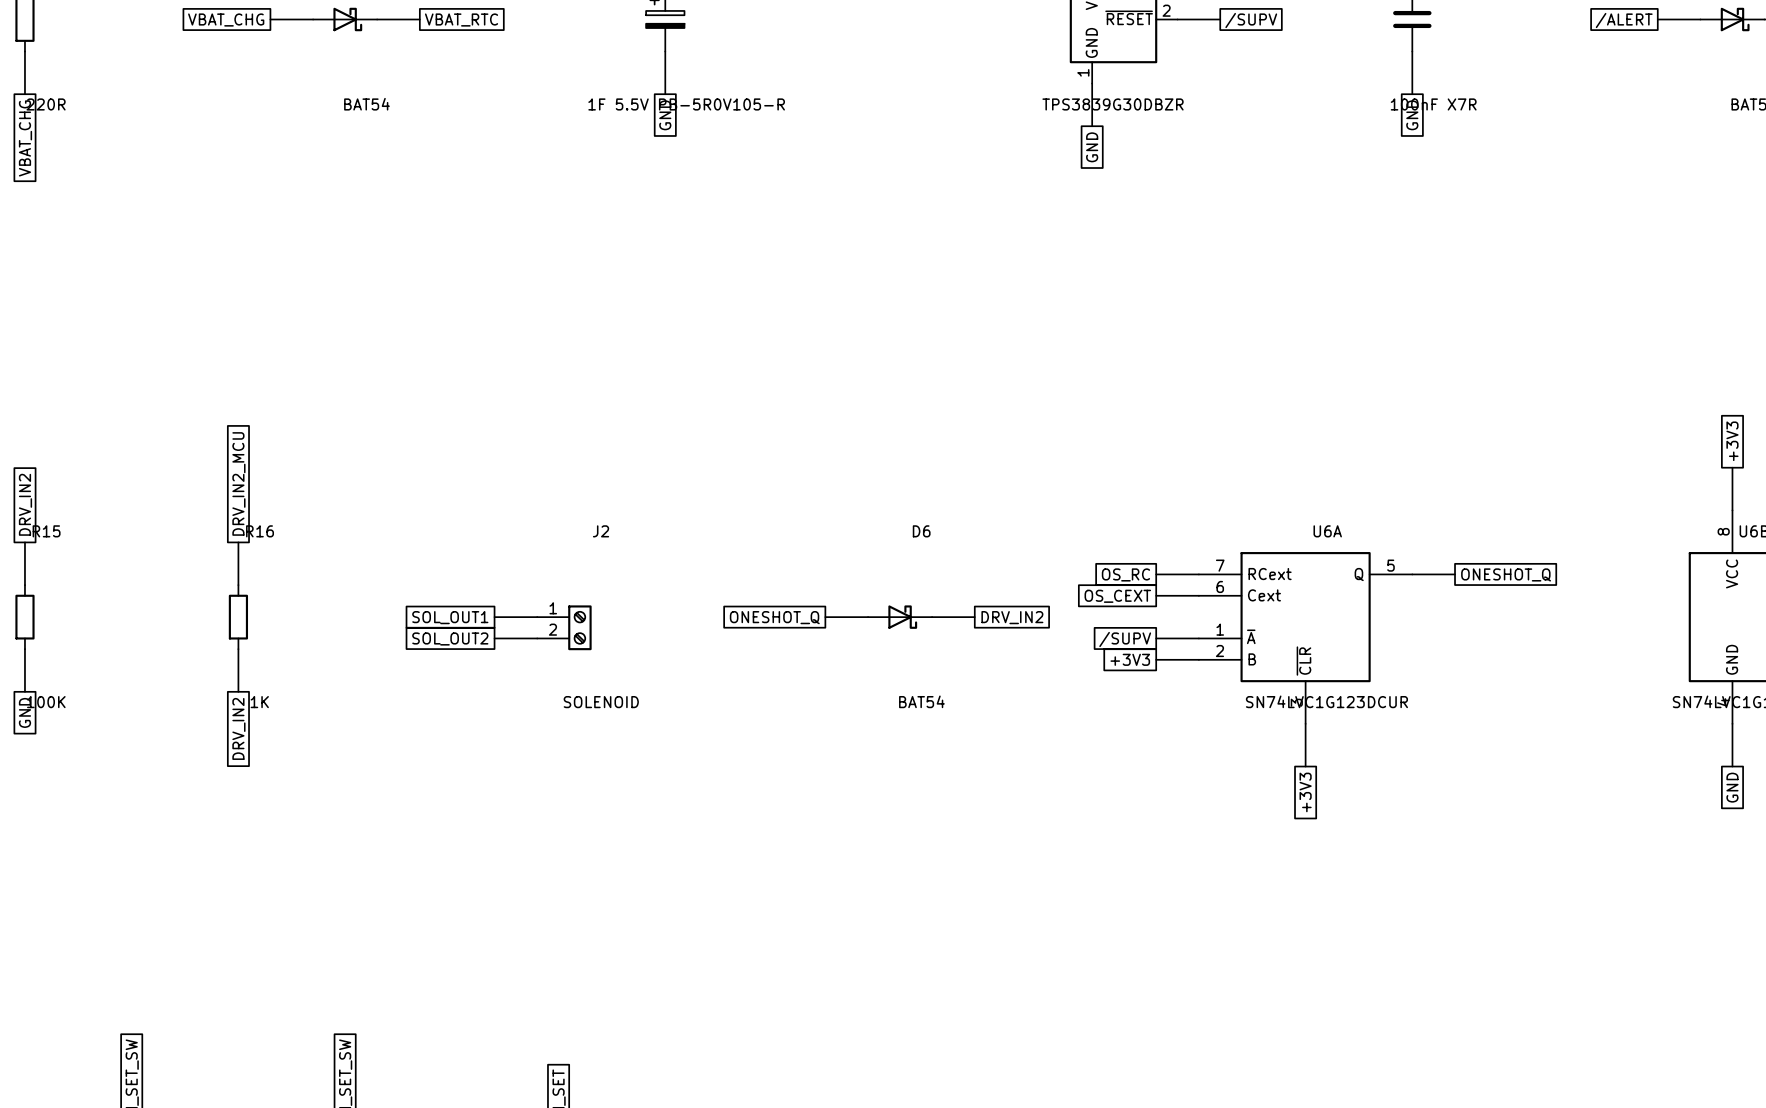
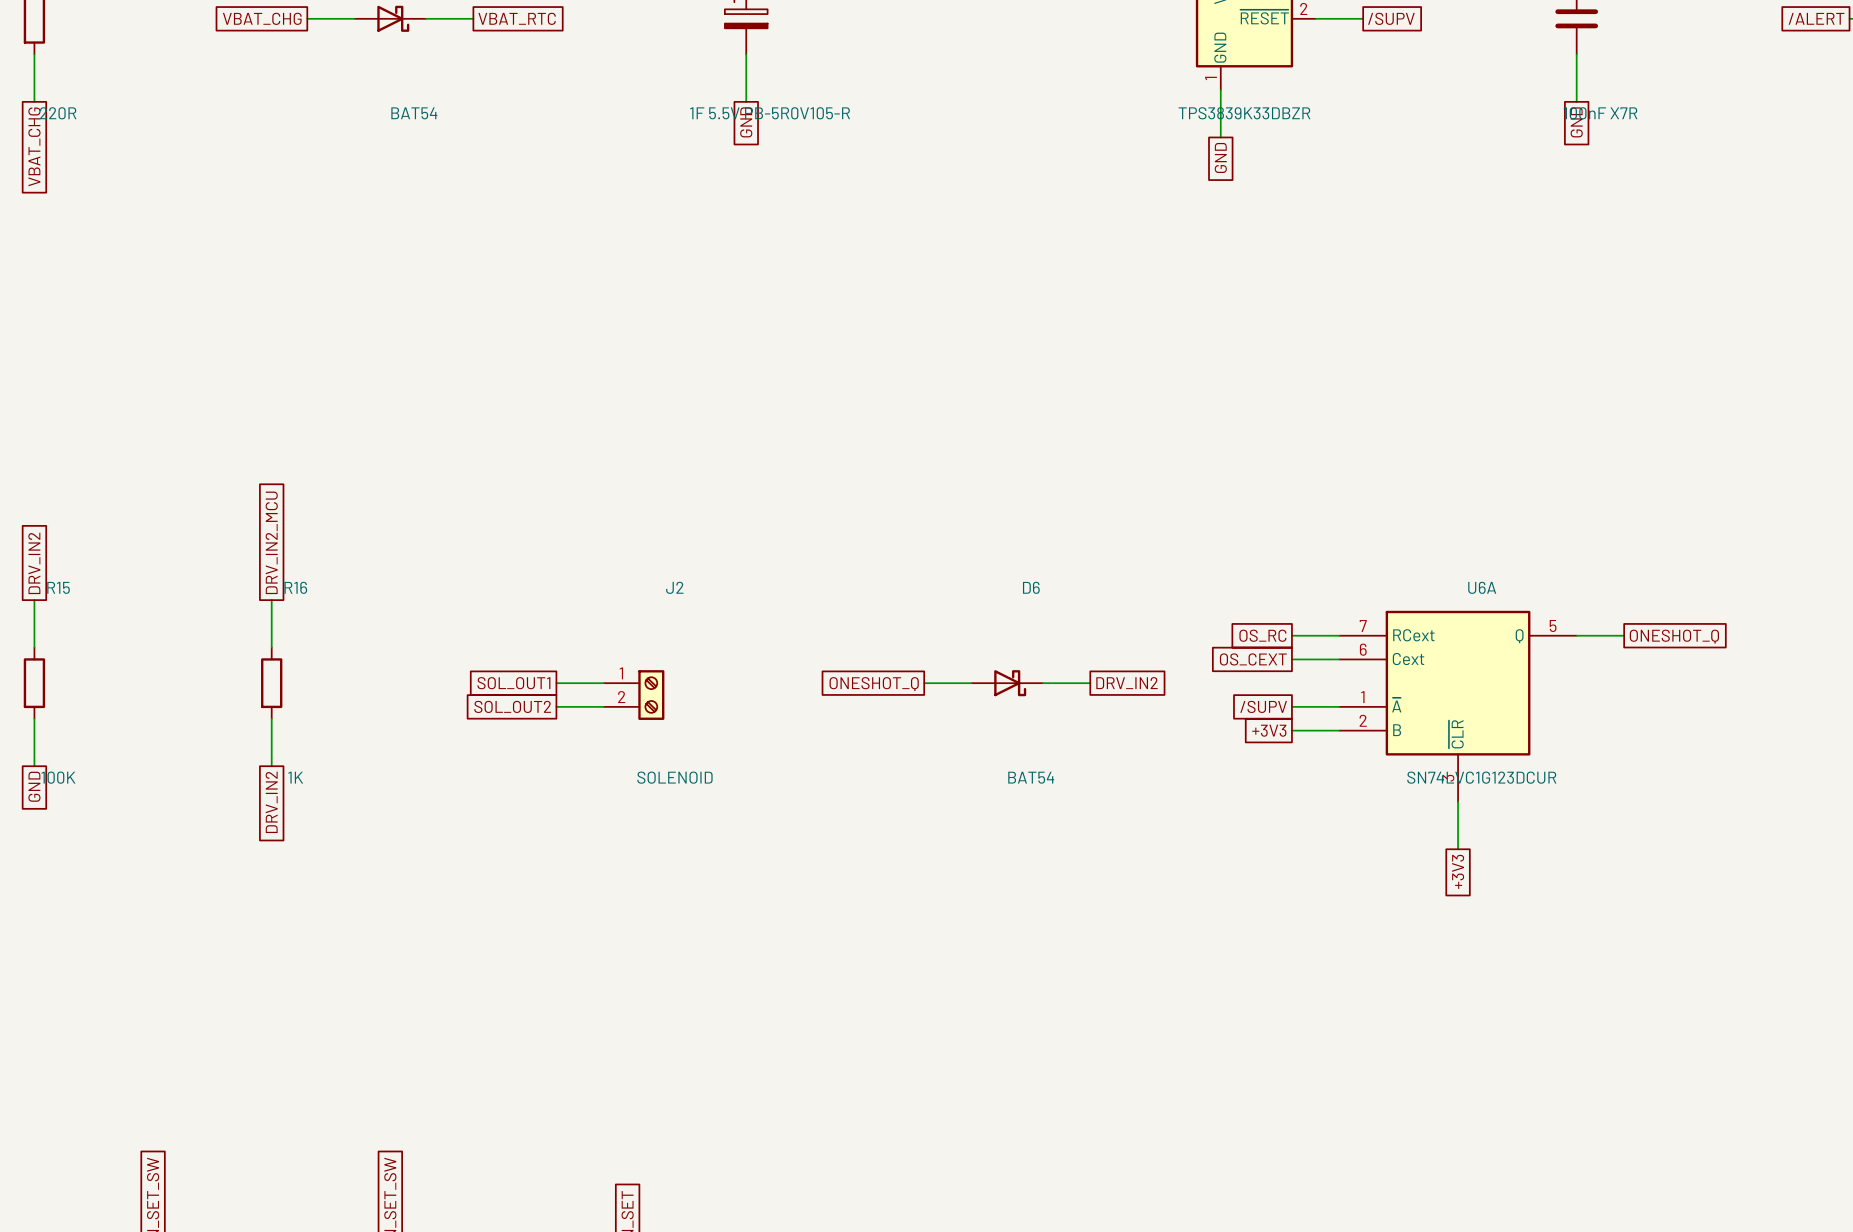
part value: TPS3839G30DBZR (1113, 104) -> TPS3839K33DBZR (1244, 113)

